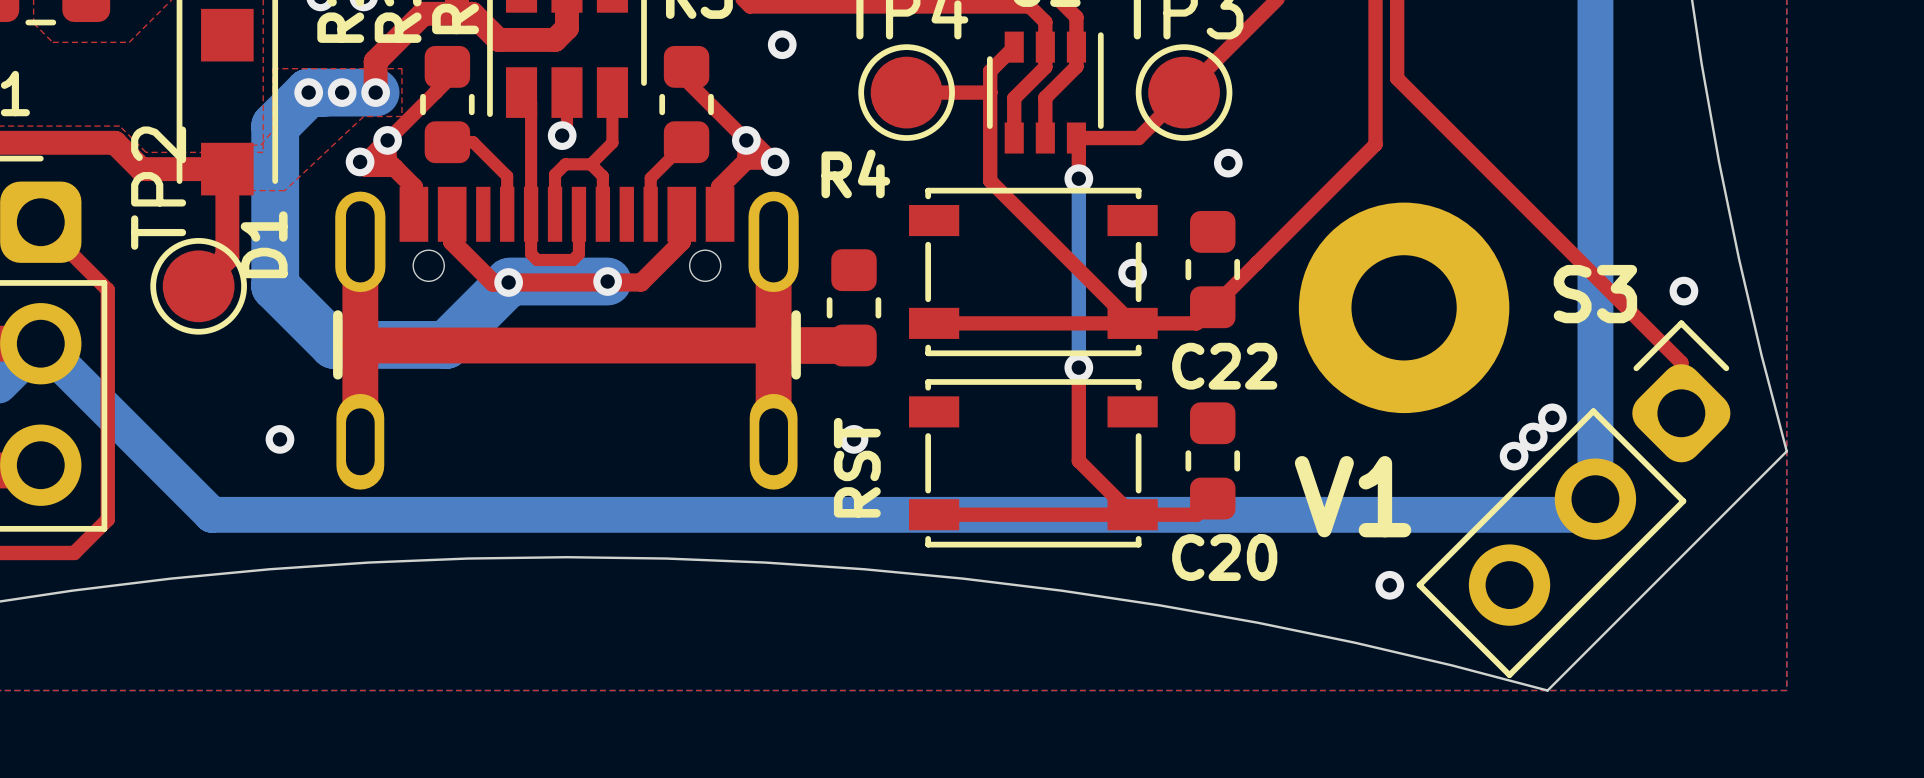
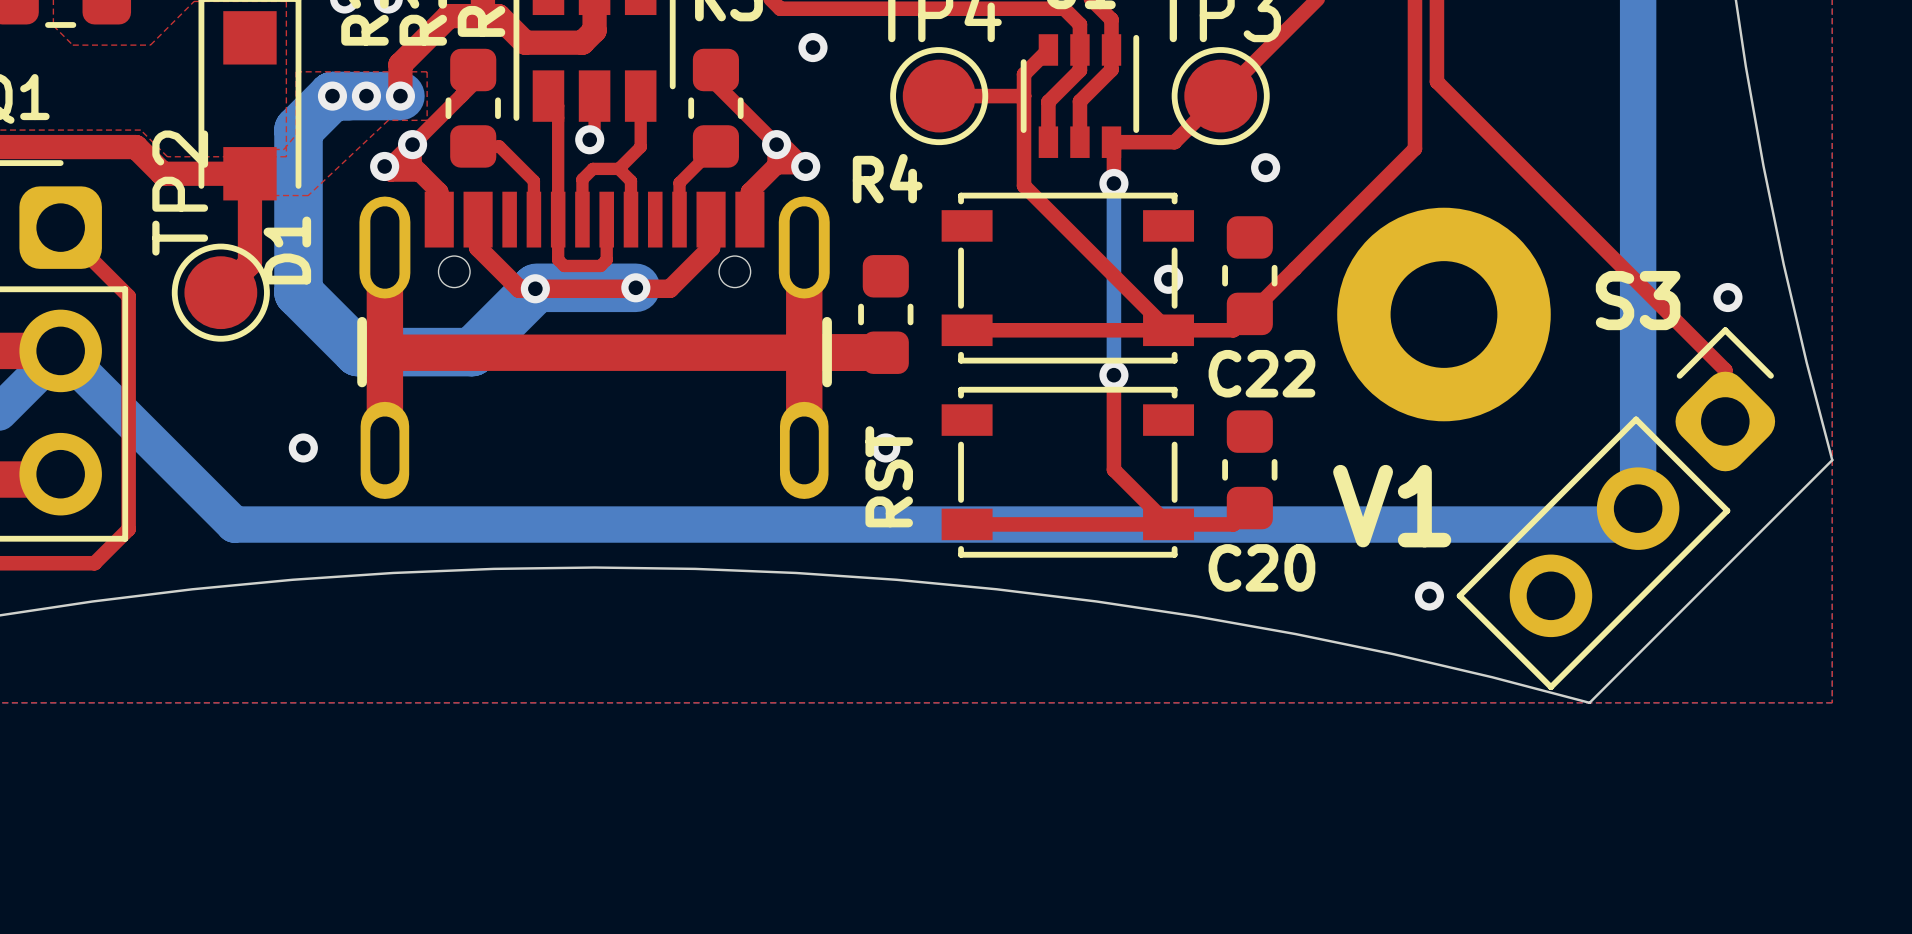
via: (1552, 417) -> none
via: (1533, 436) -> none
via: (1514, 456) -> none

